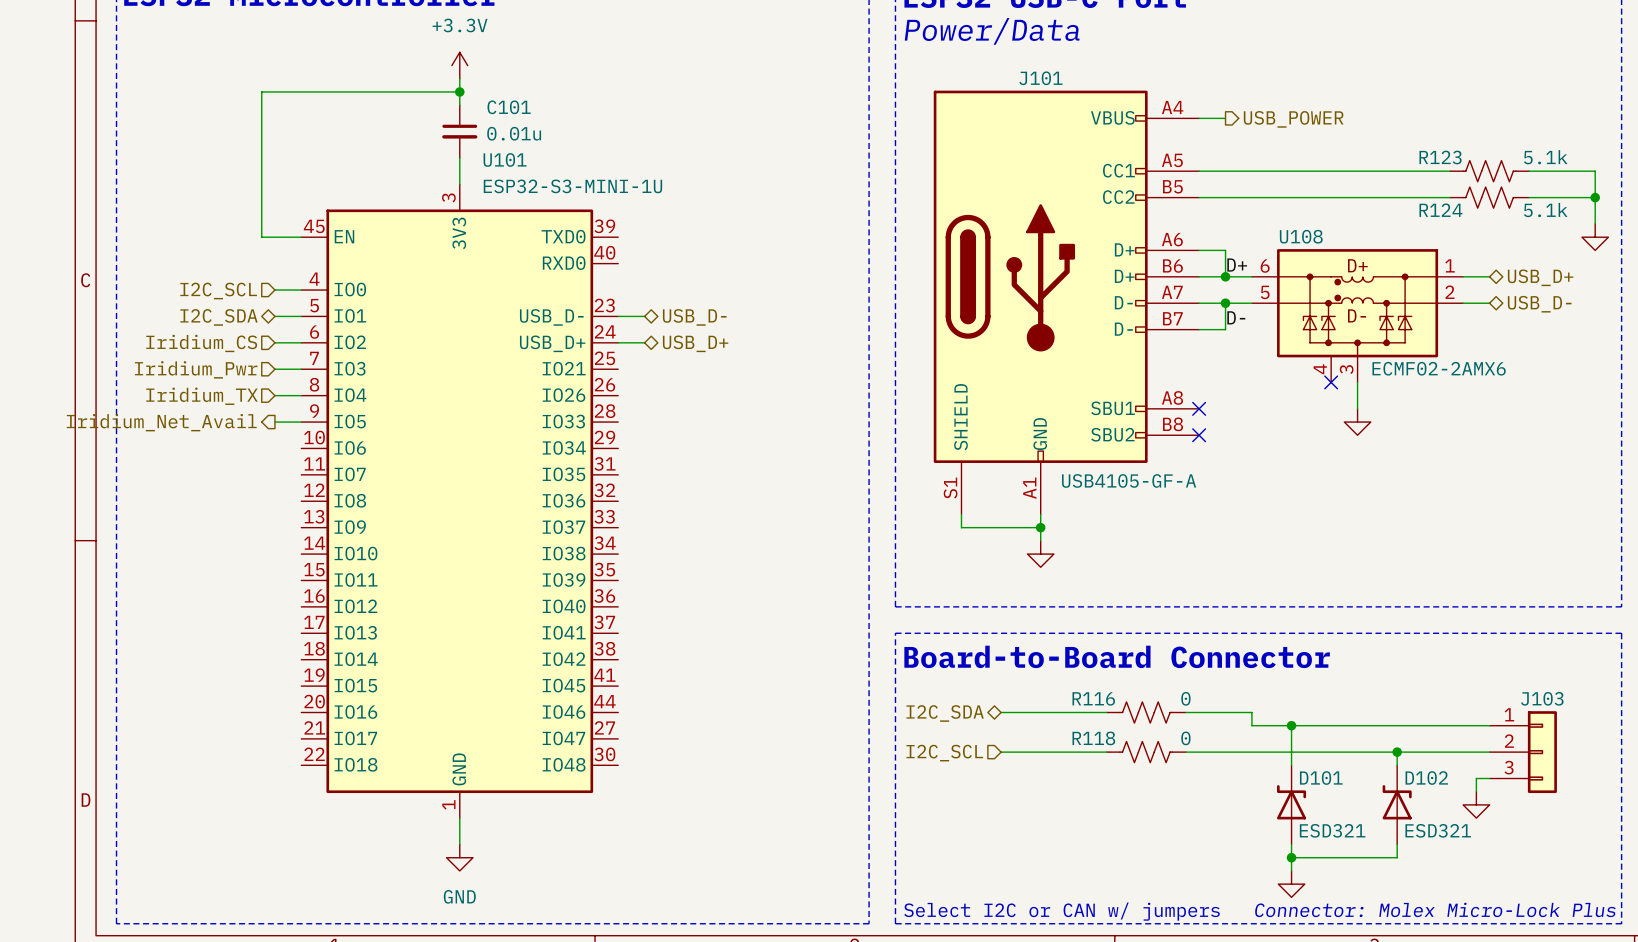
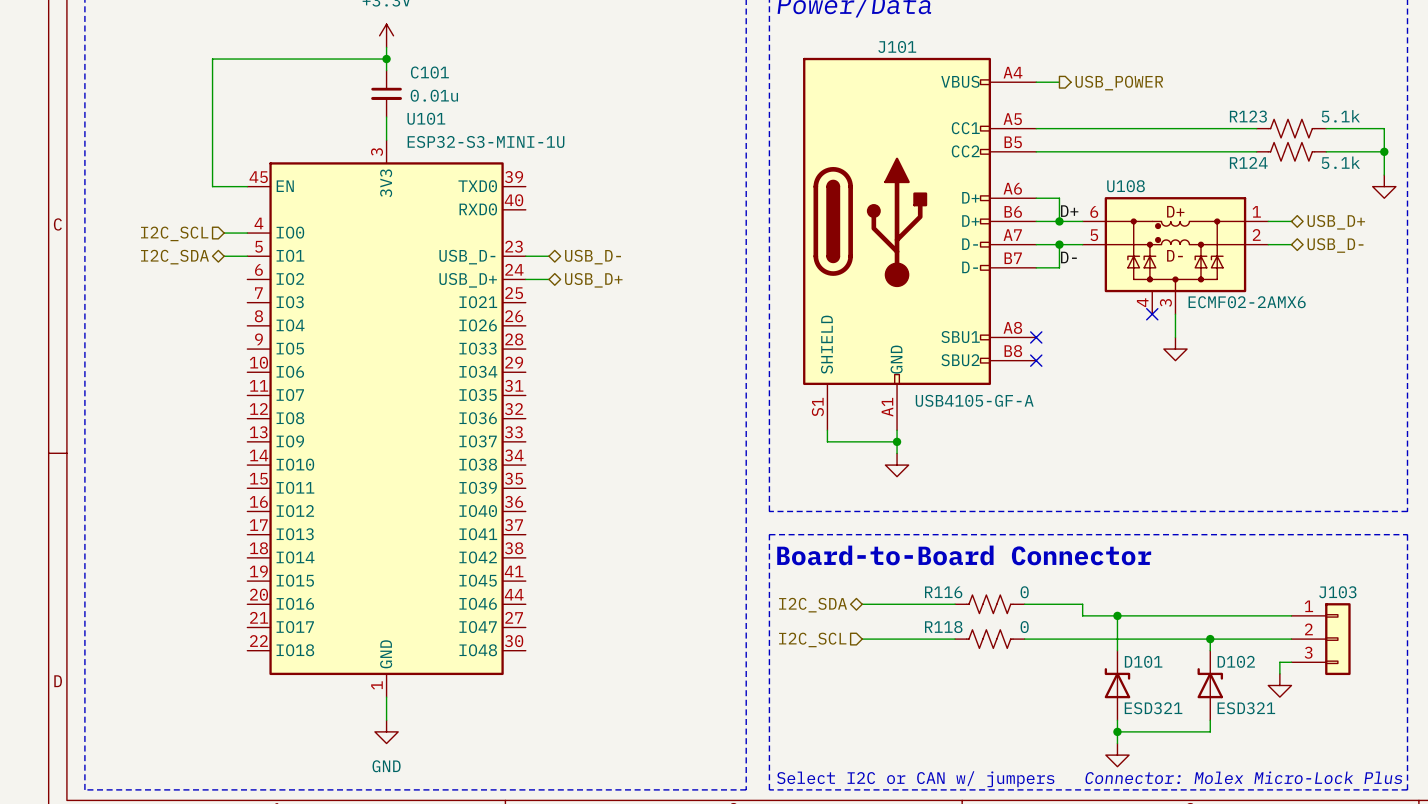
wire: (274, 342) (301, 342) -> none
hierarchical label: Iridium_CS (201, 343) -> none
hierarchical label: Iridium_Pwr (196, 369) -> none
wire: (274, 369) (301, 369) -> none
wire: (274, 395) (301, 395) -> none
hierarchical label: Iridium_TX (201, 396) -> none
hierarchical label: Iridium_Net_Avail (161, 422) -> none
wire: (274, 422) (301, 422) -> none

